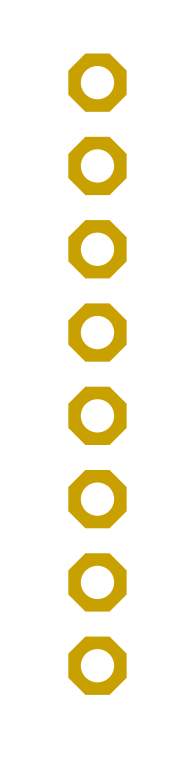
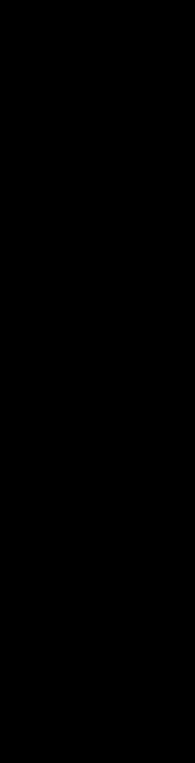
part: (97, 374) -> none

